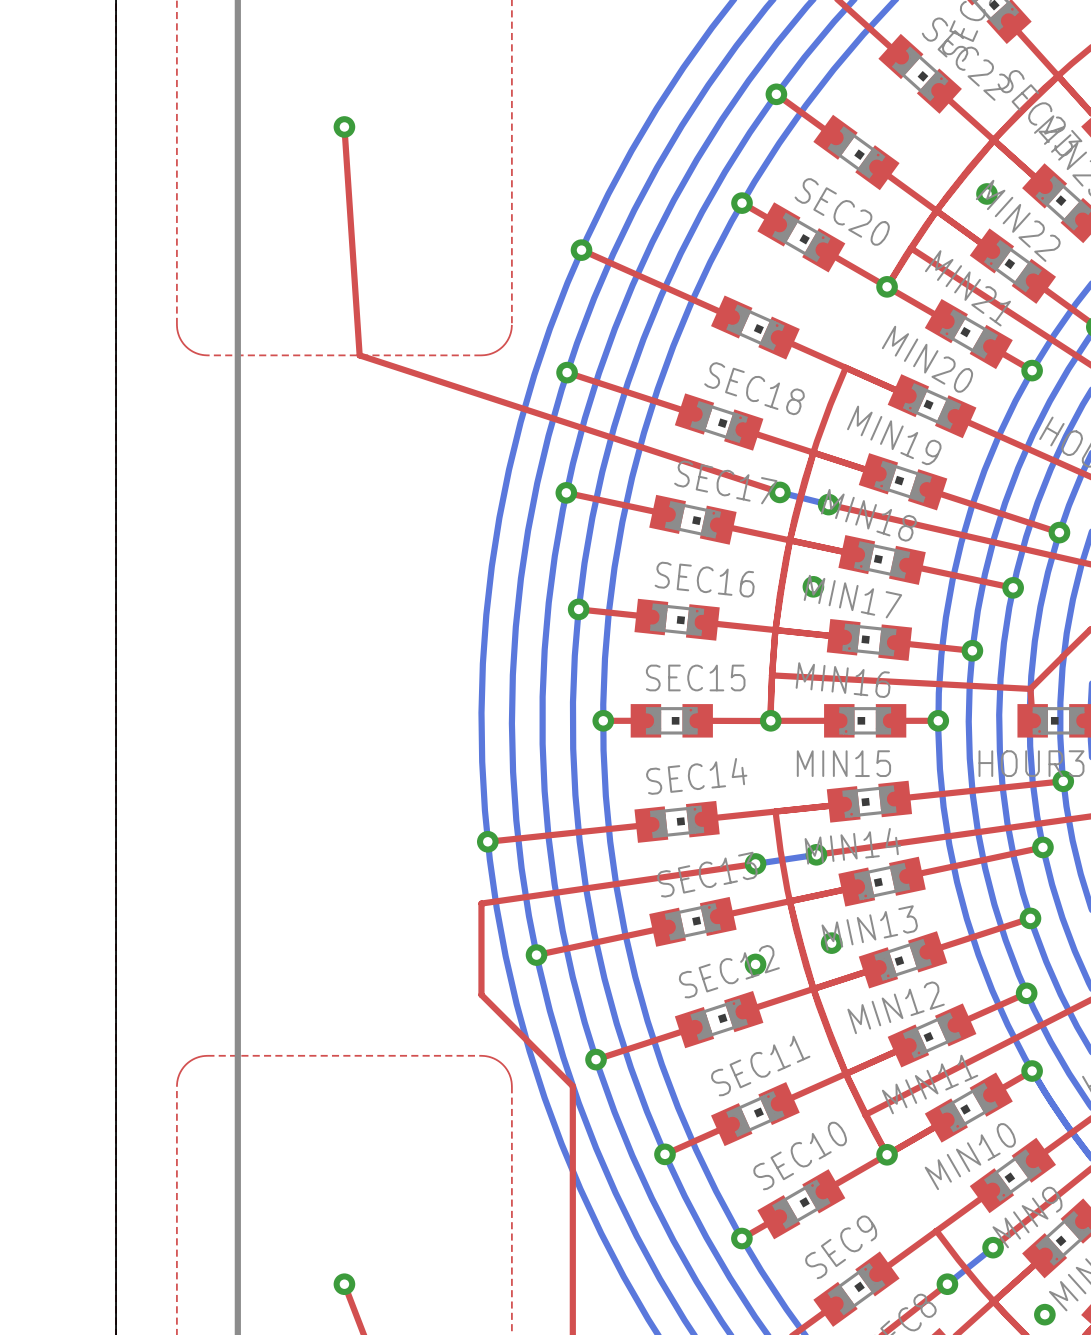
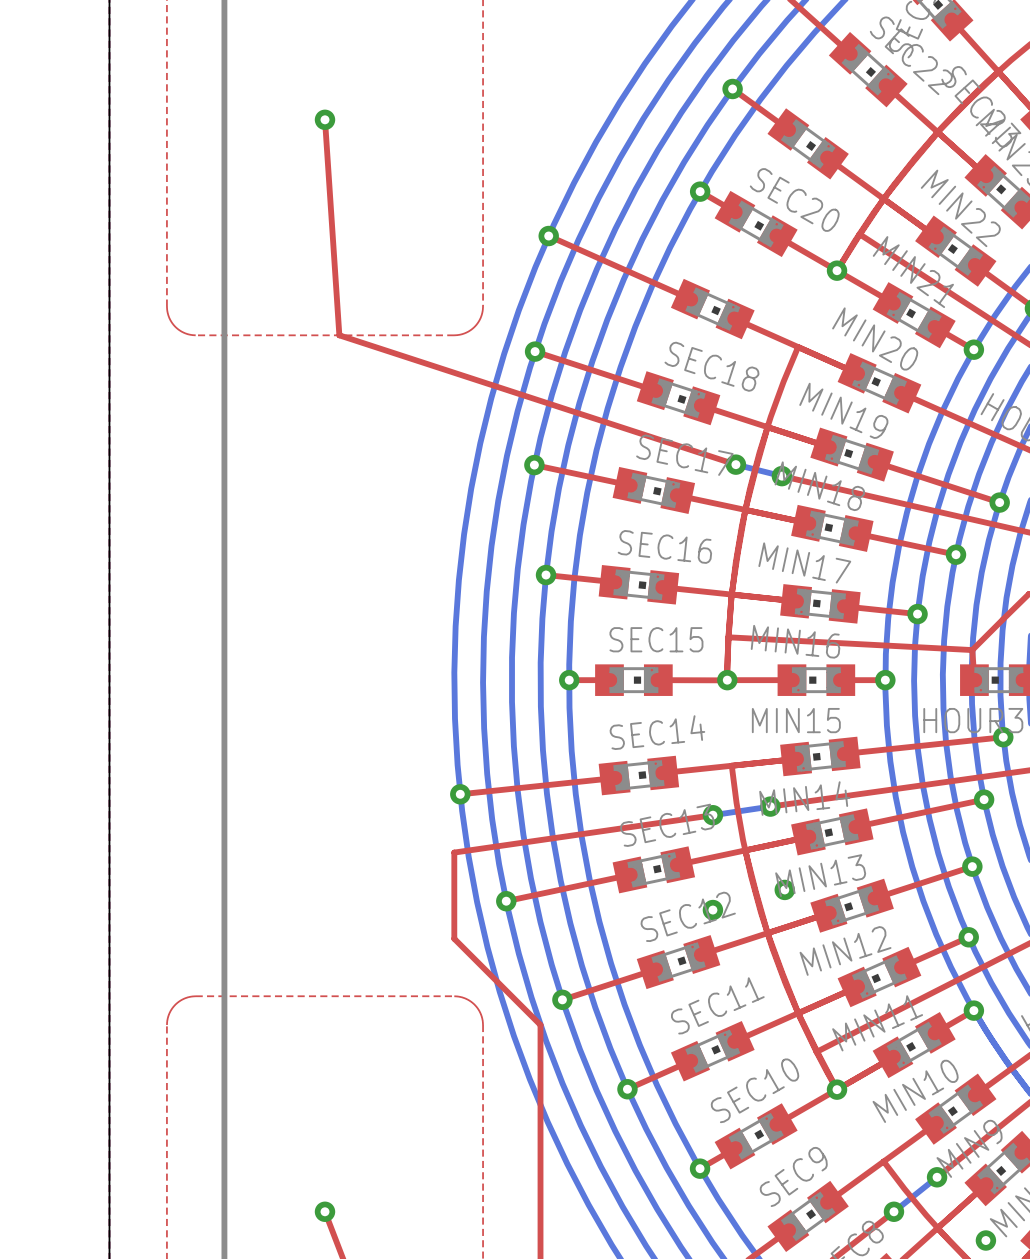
via: (986, 193) -> none
via: (813, 586) -> none

